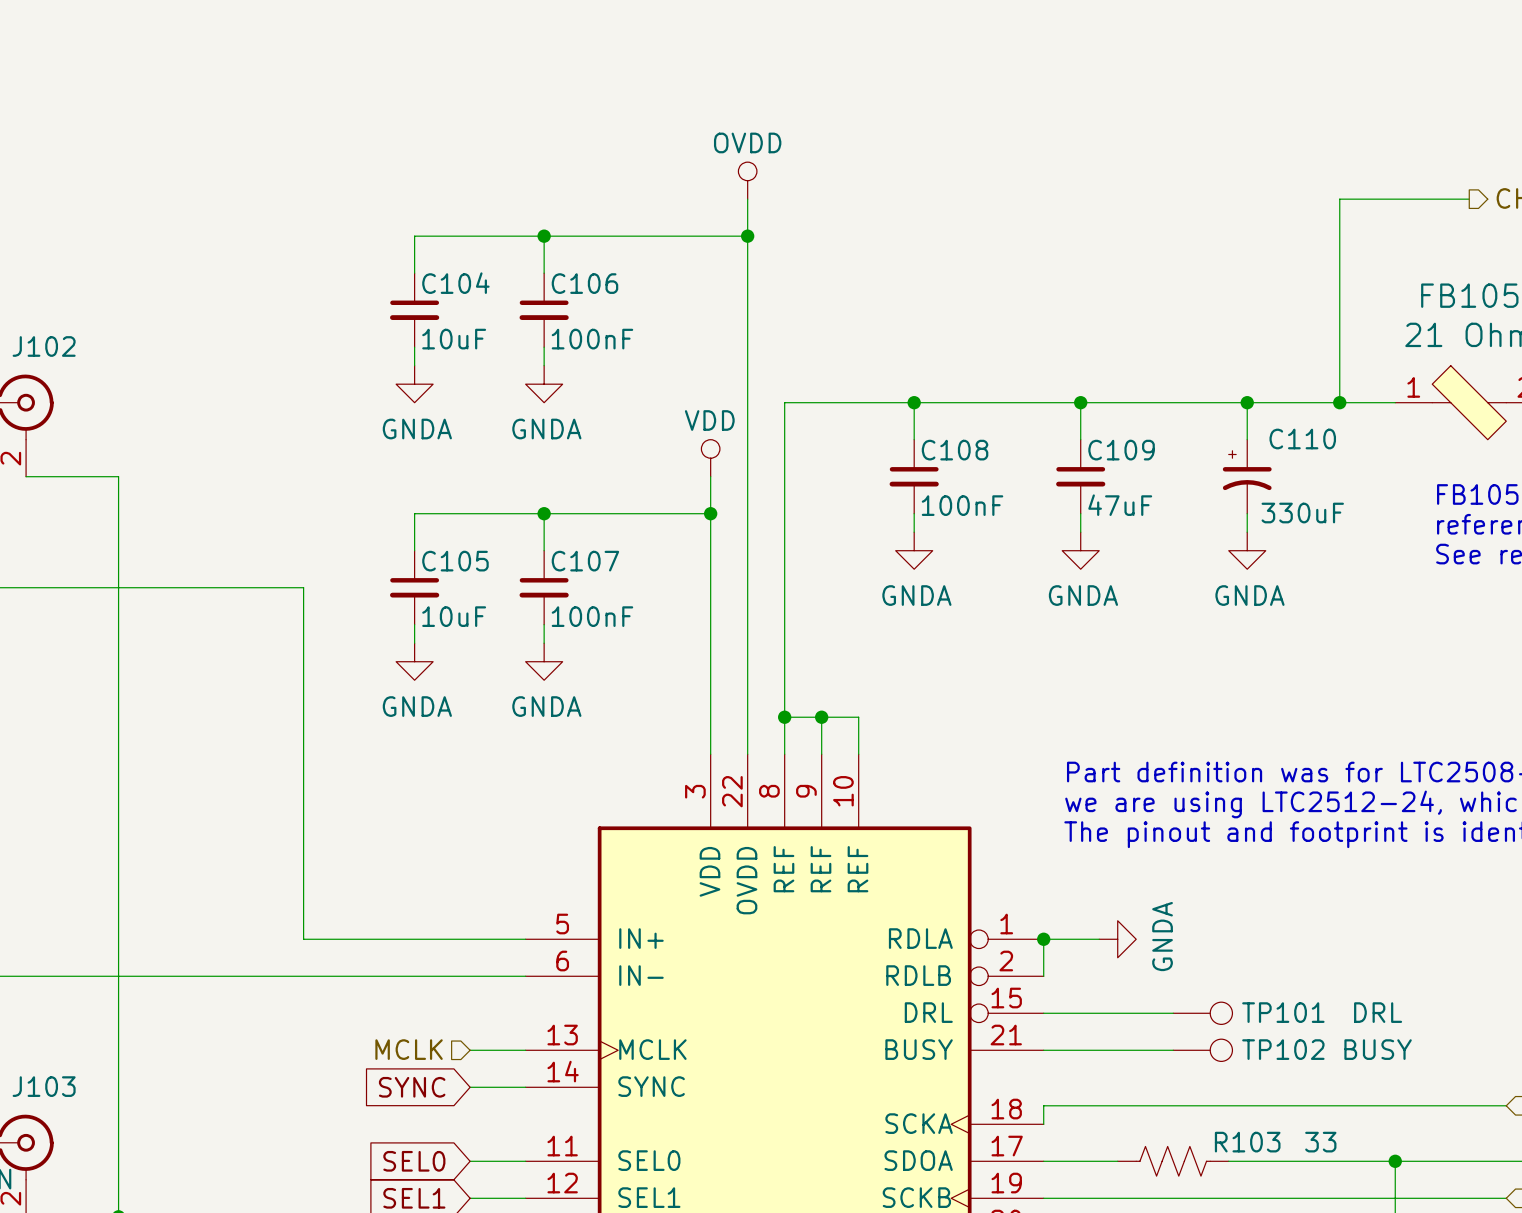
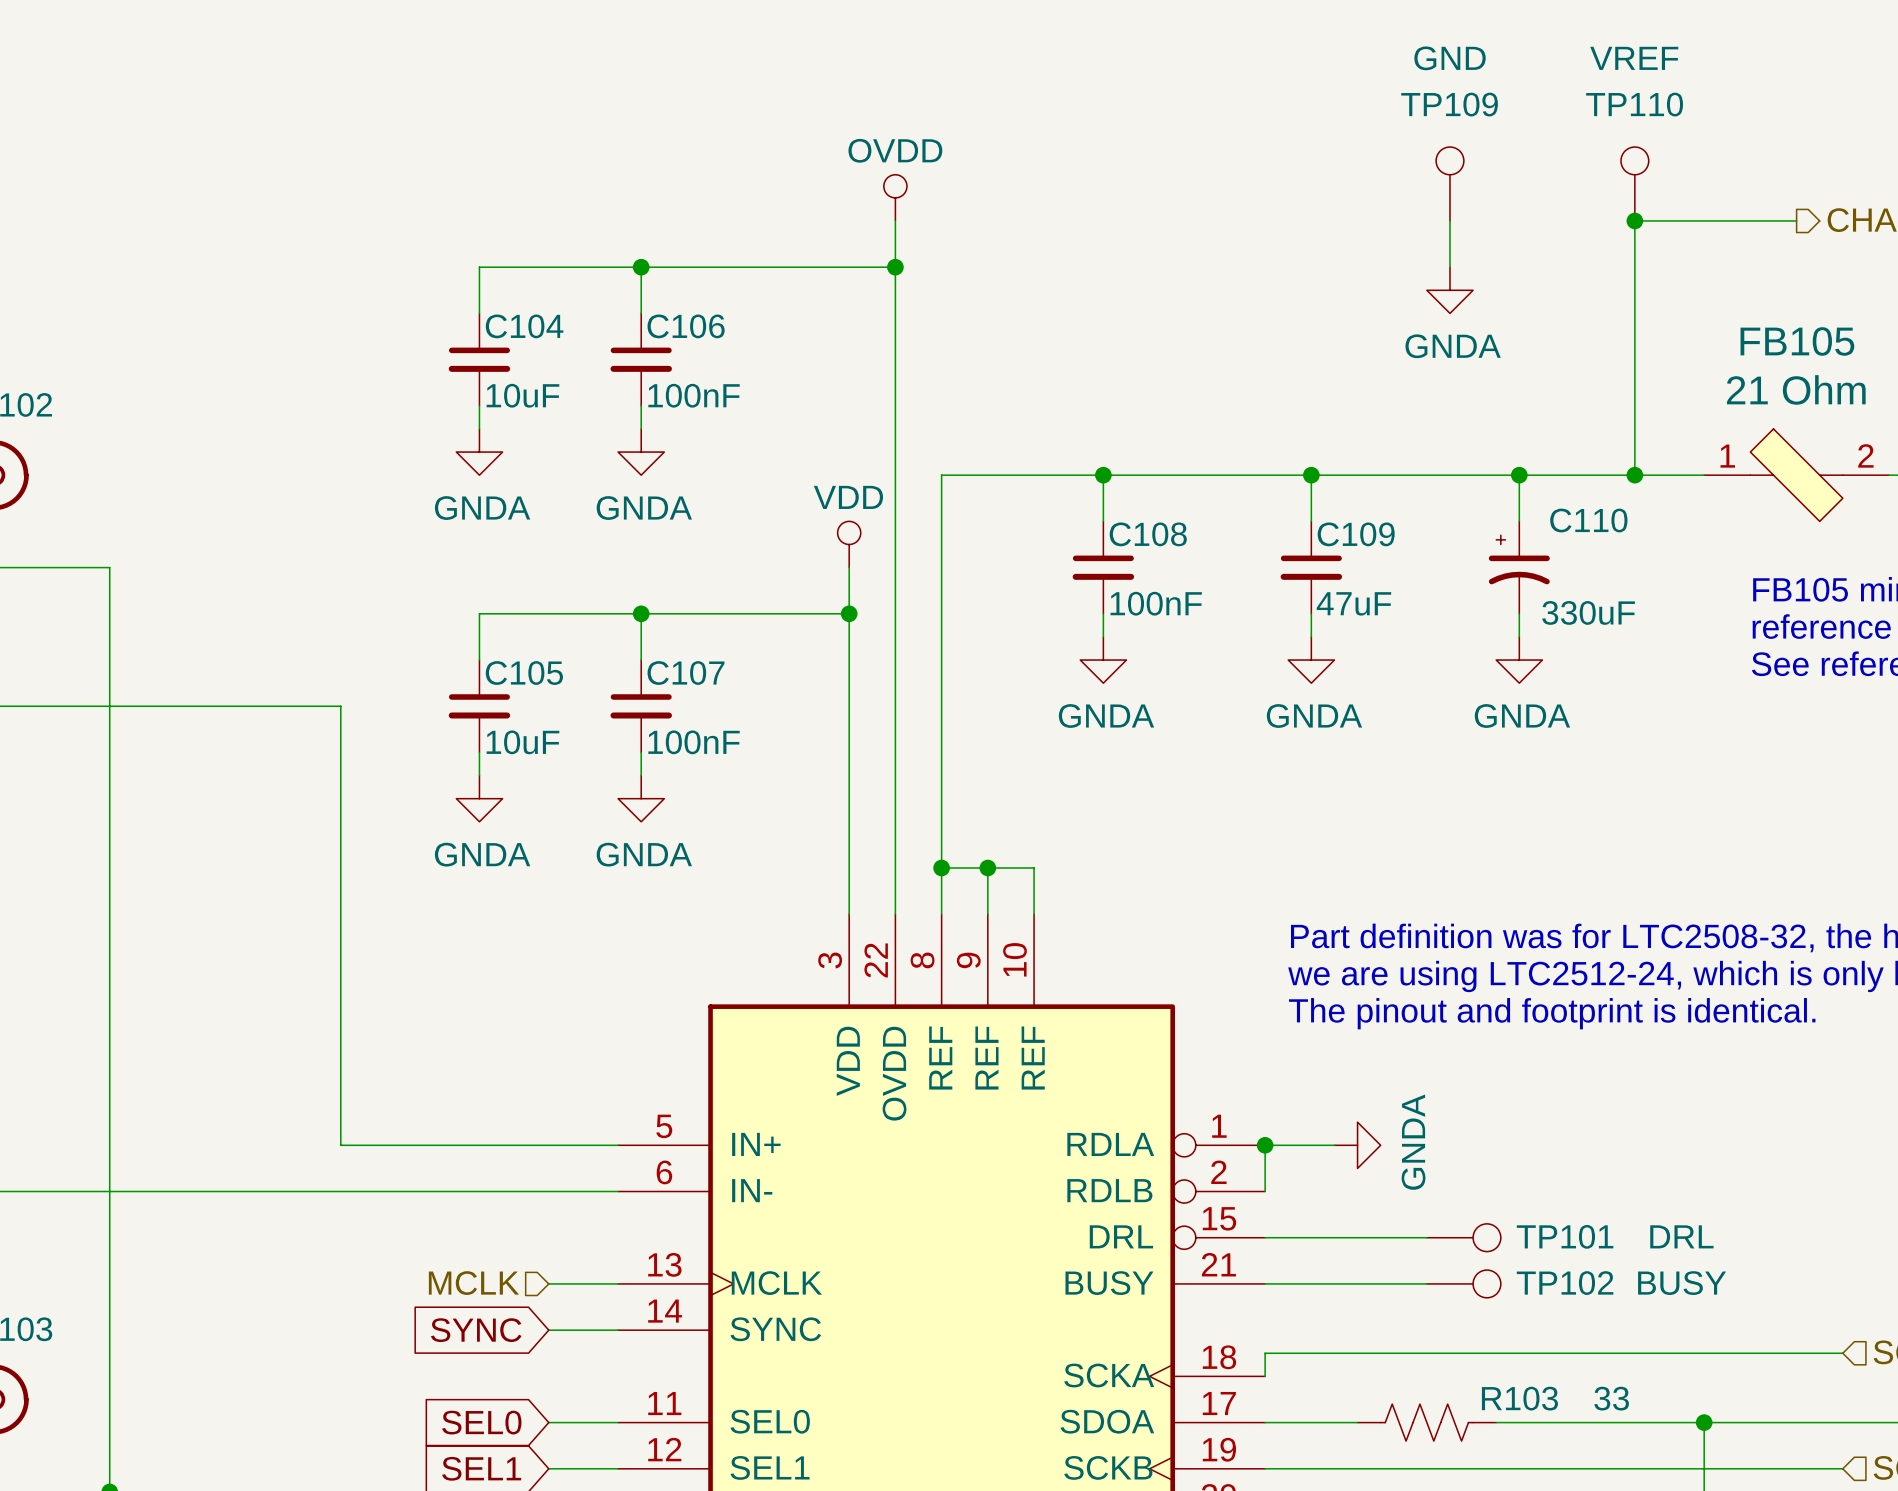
TP109: none -> GND (1449, 184)
TP110: none -> VREF (1634, 184)
wire: none -> (1449, 220) (1449, 267)
junction: none -> (1634, 220)
power symbol: none -> GNDA (1449, 290)

